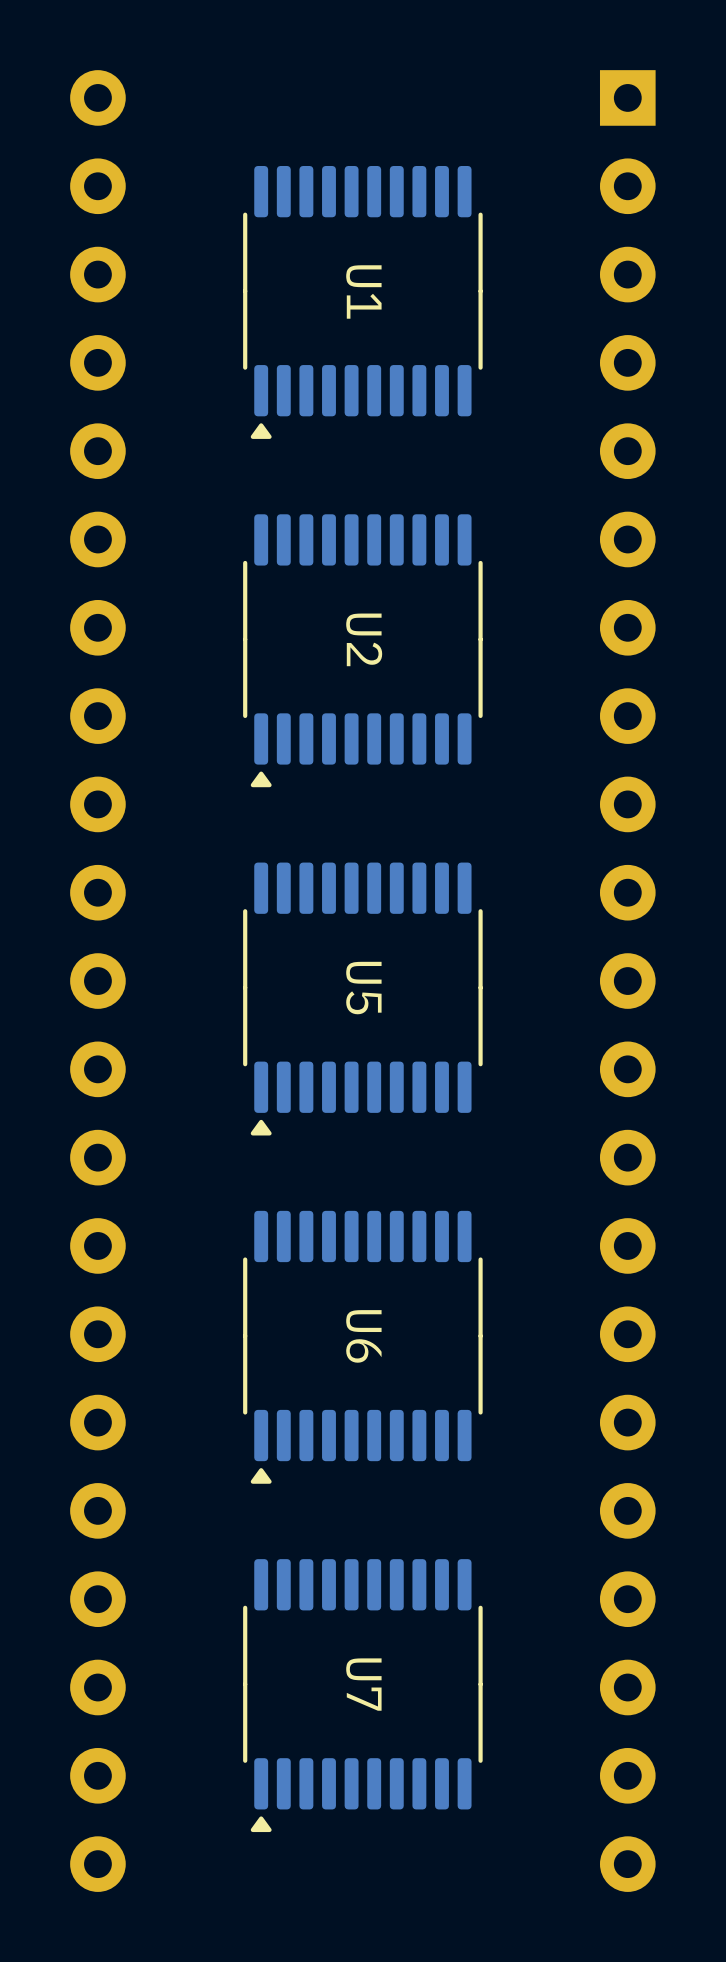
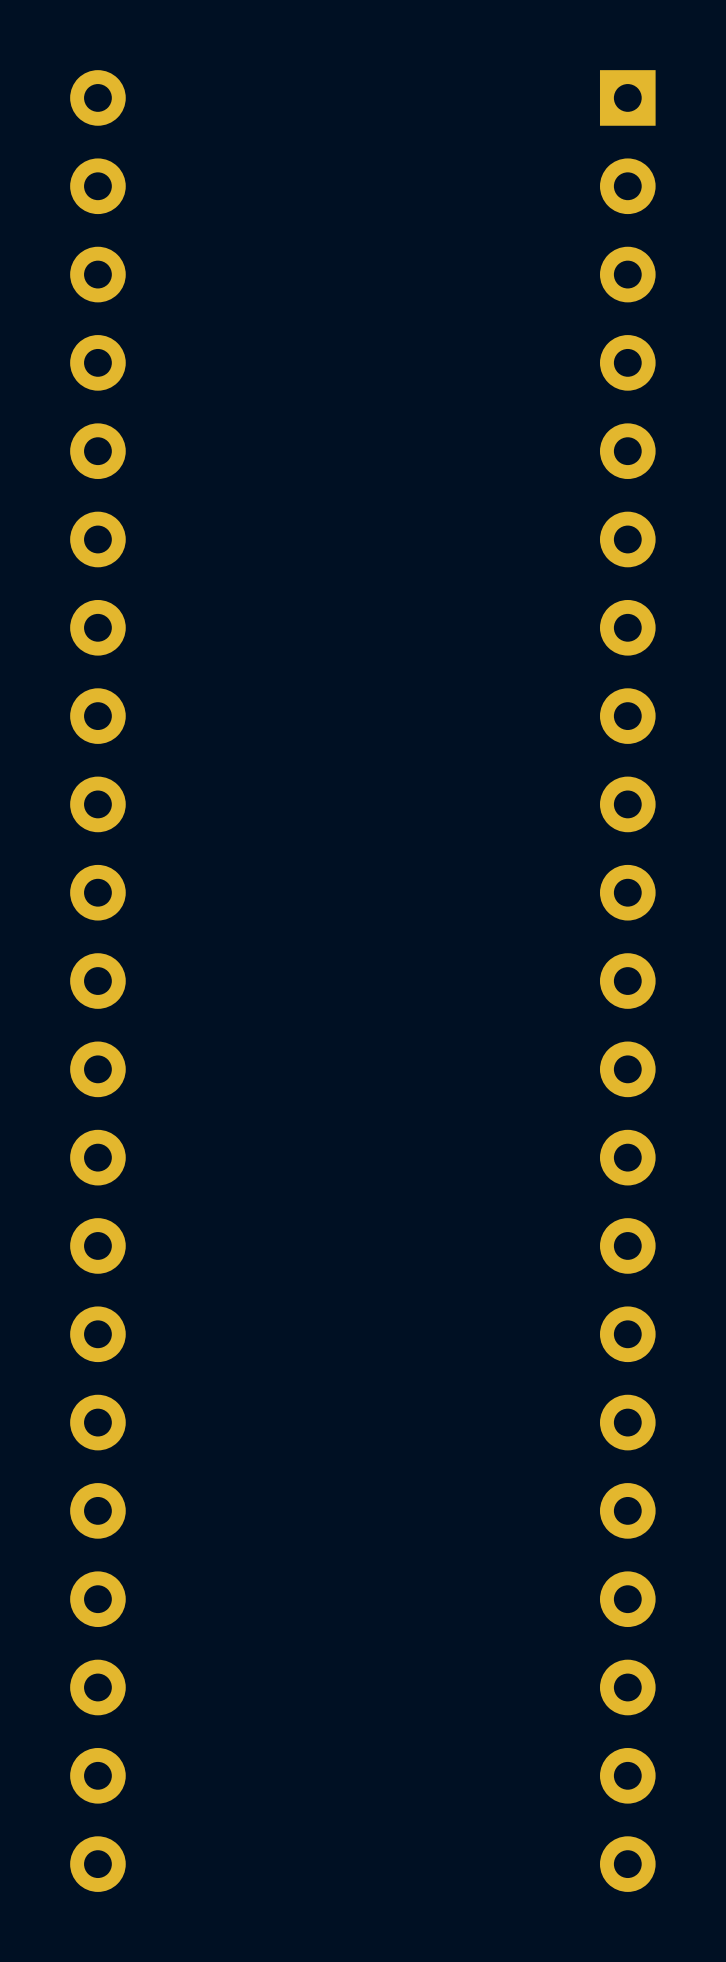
U1: (362, 302) -> none
U2: (362, 650) -> none
U5: (362, 999) -> none
U6: (362, 1347) -> none
U7: (362, 1695) -> none

